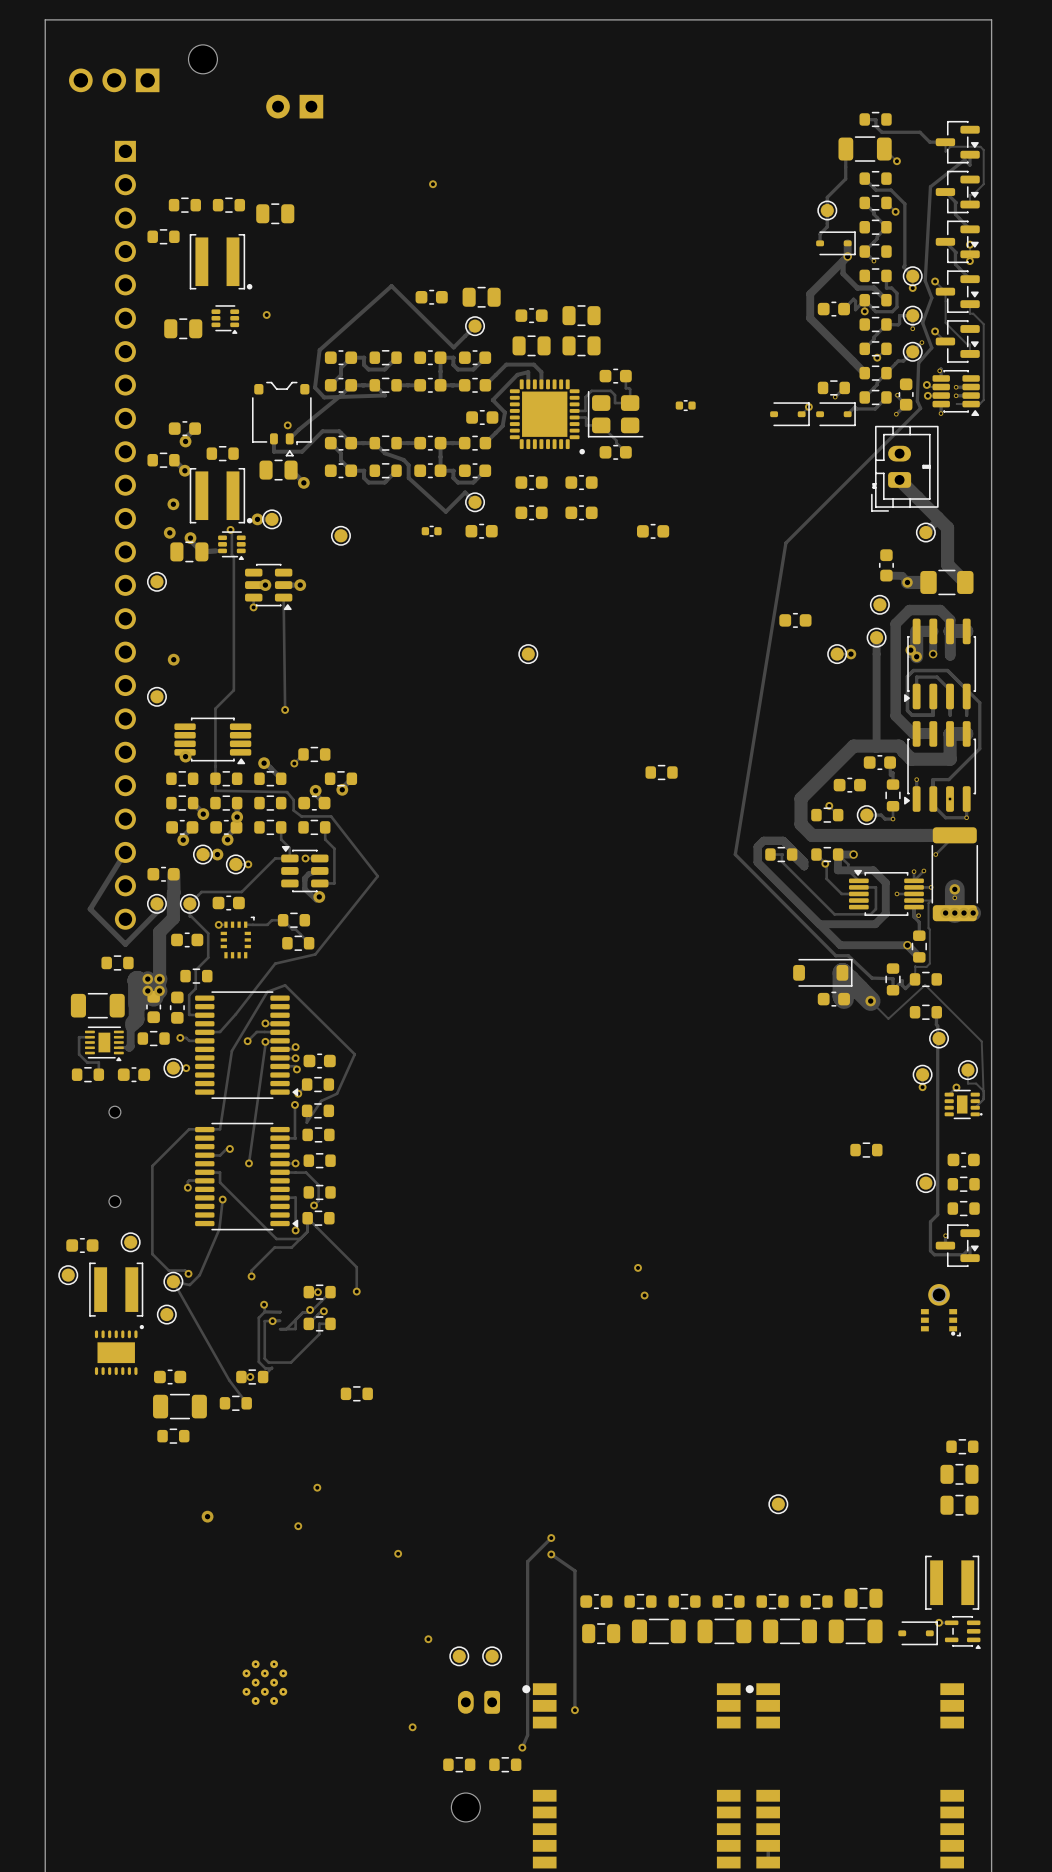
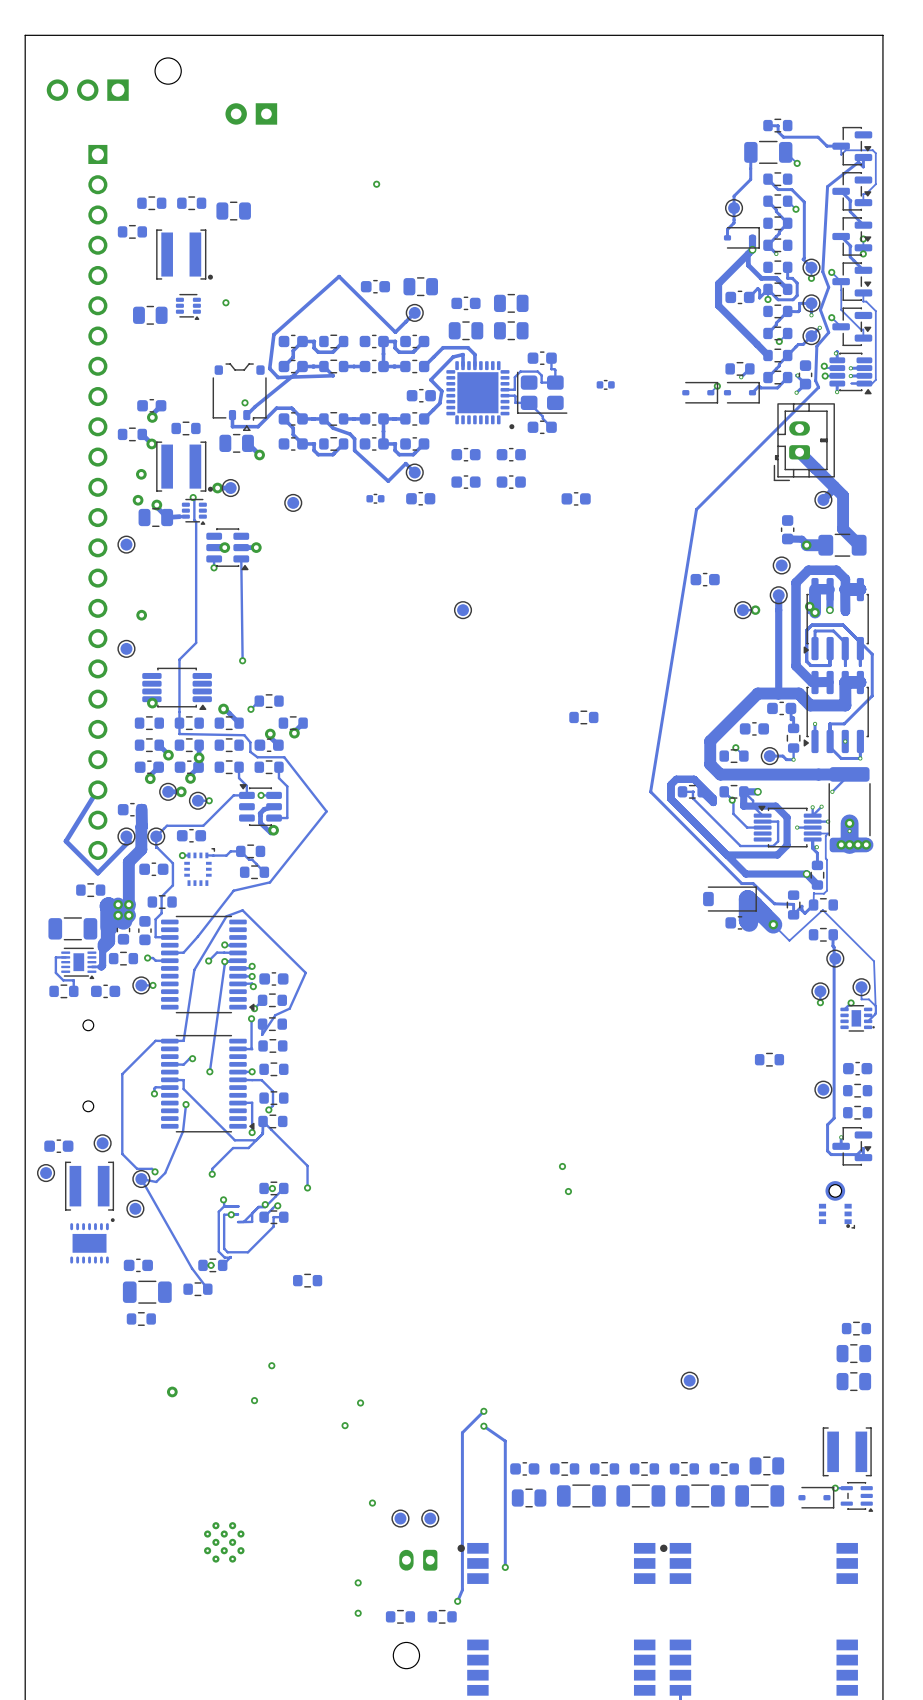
via: none -> (360, 1402)
via: none -> (358, 1613)

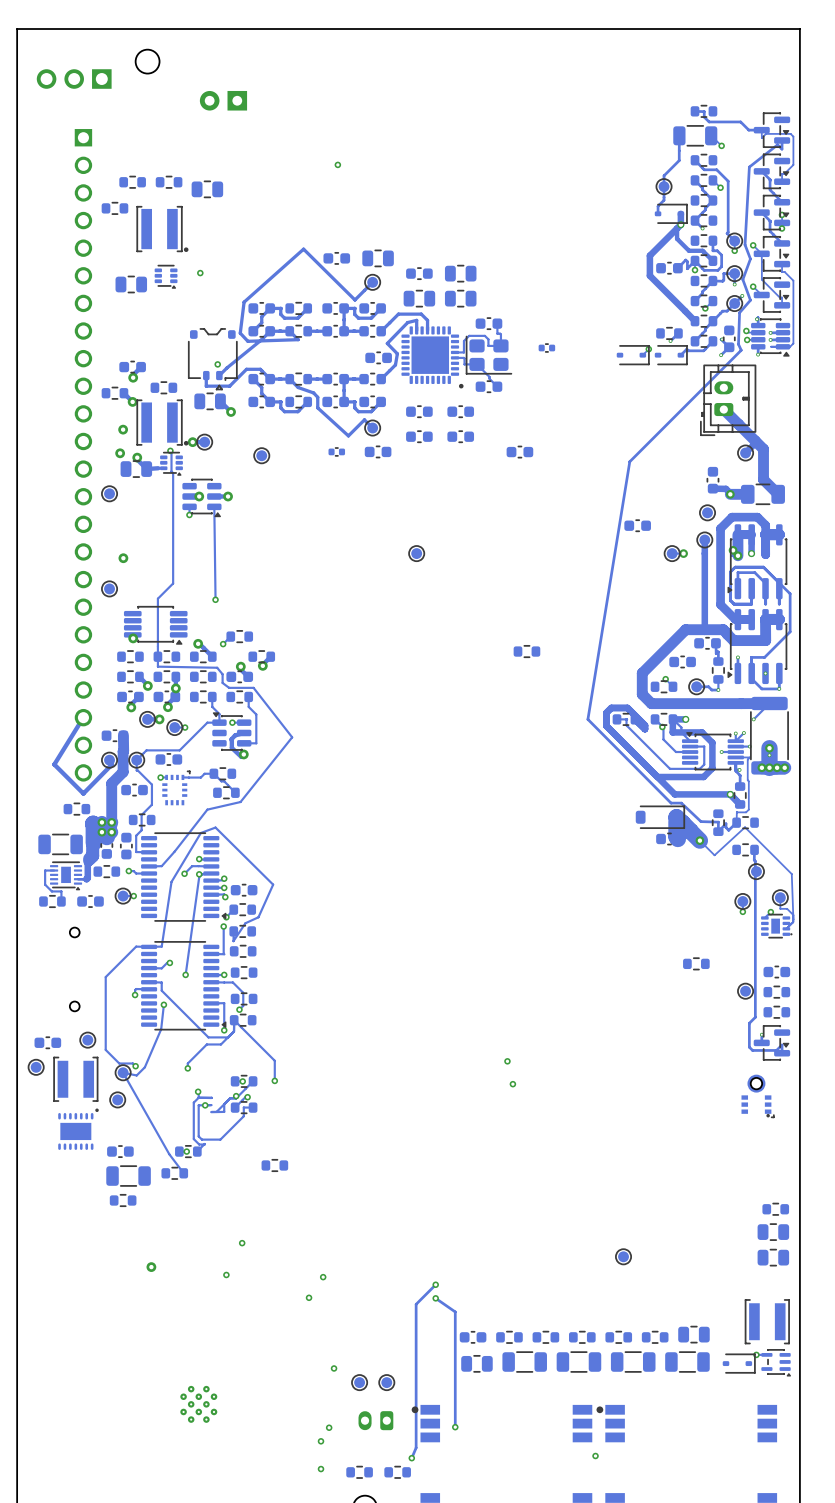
via: none -> (329, 1427)
via: none -> (595, 1456)

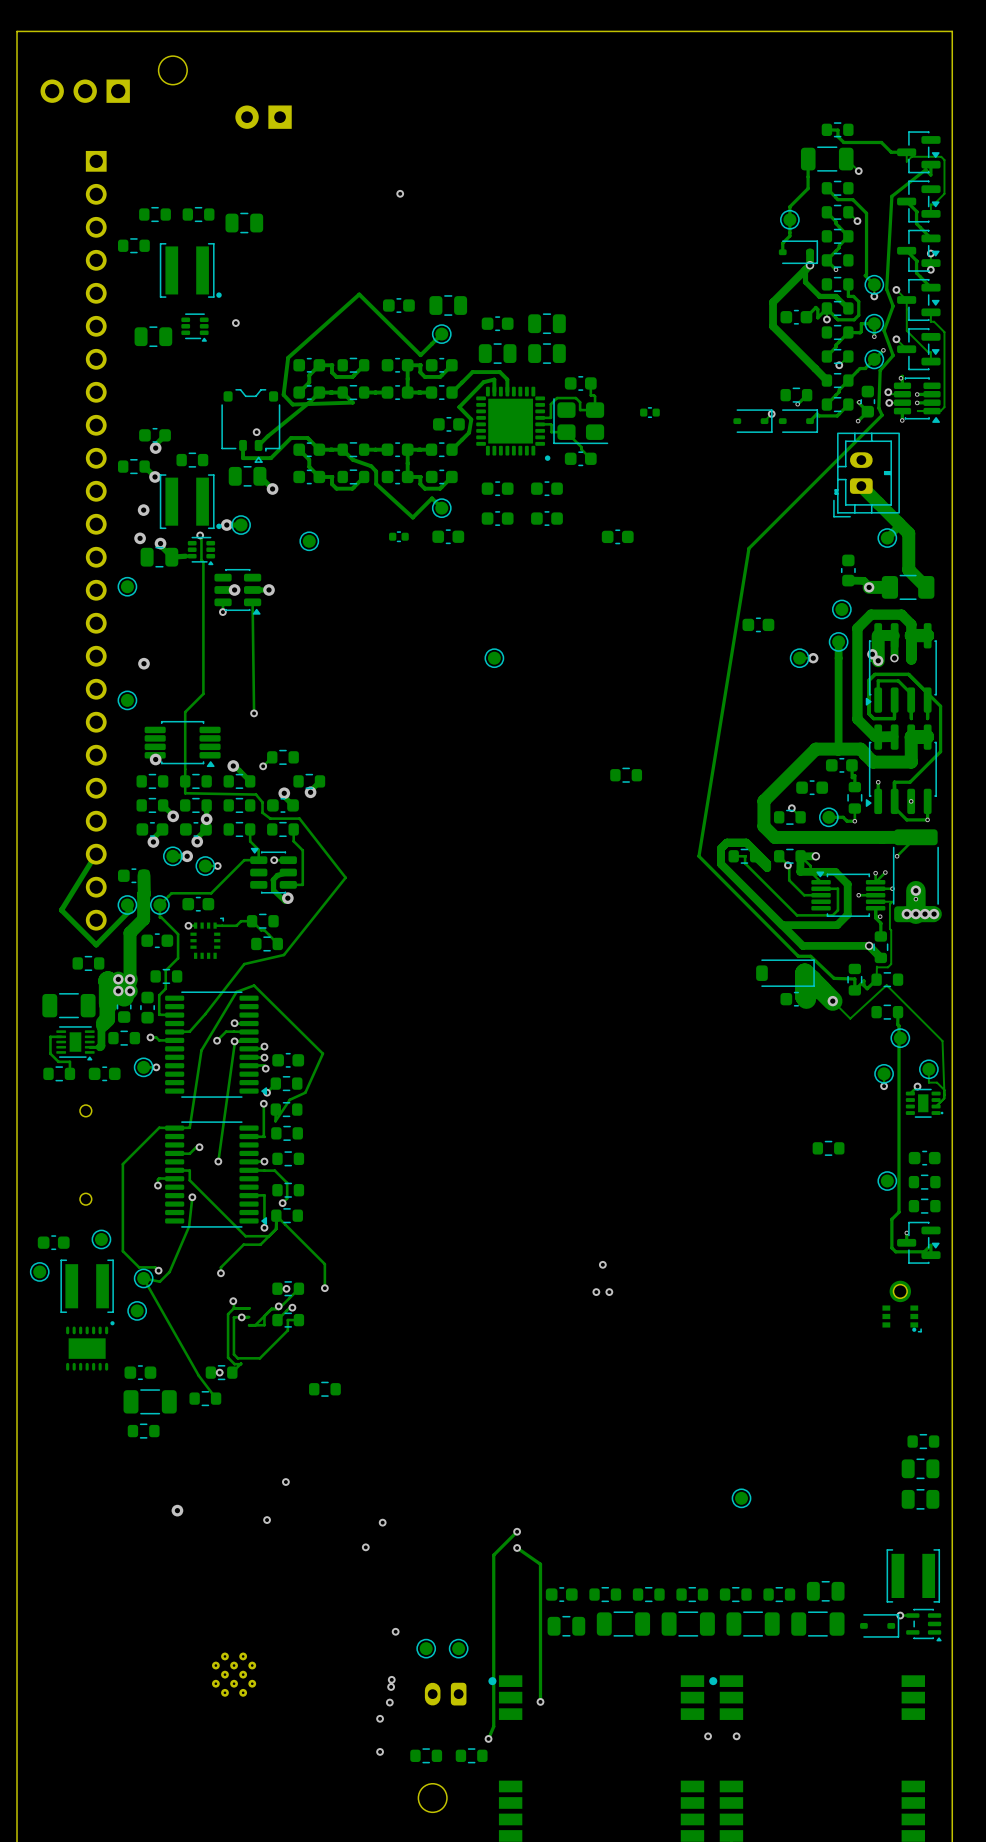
via: none -> (596, 1292)
via: none -> (391, 1679)
via: none -> (391, 1686)
via: none -> (736, 1736)

